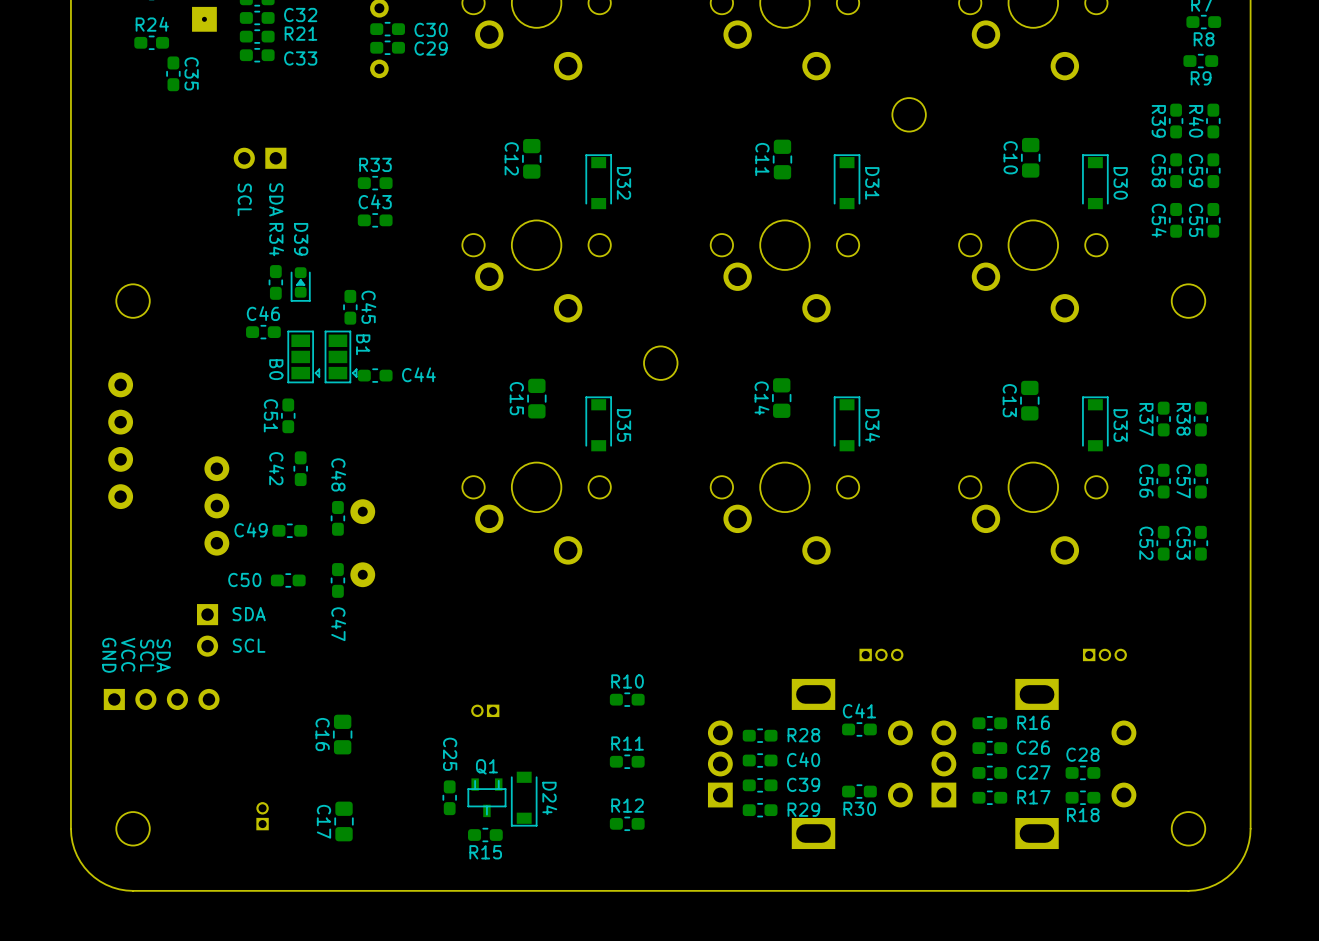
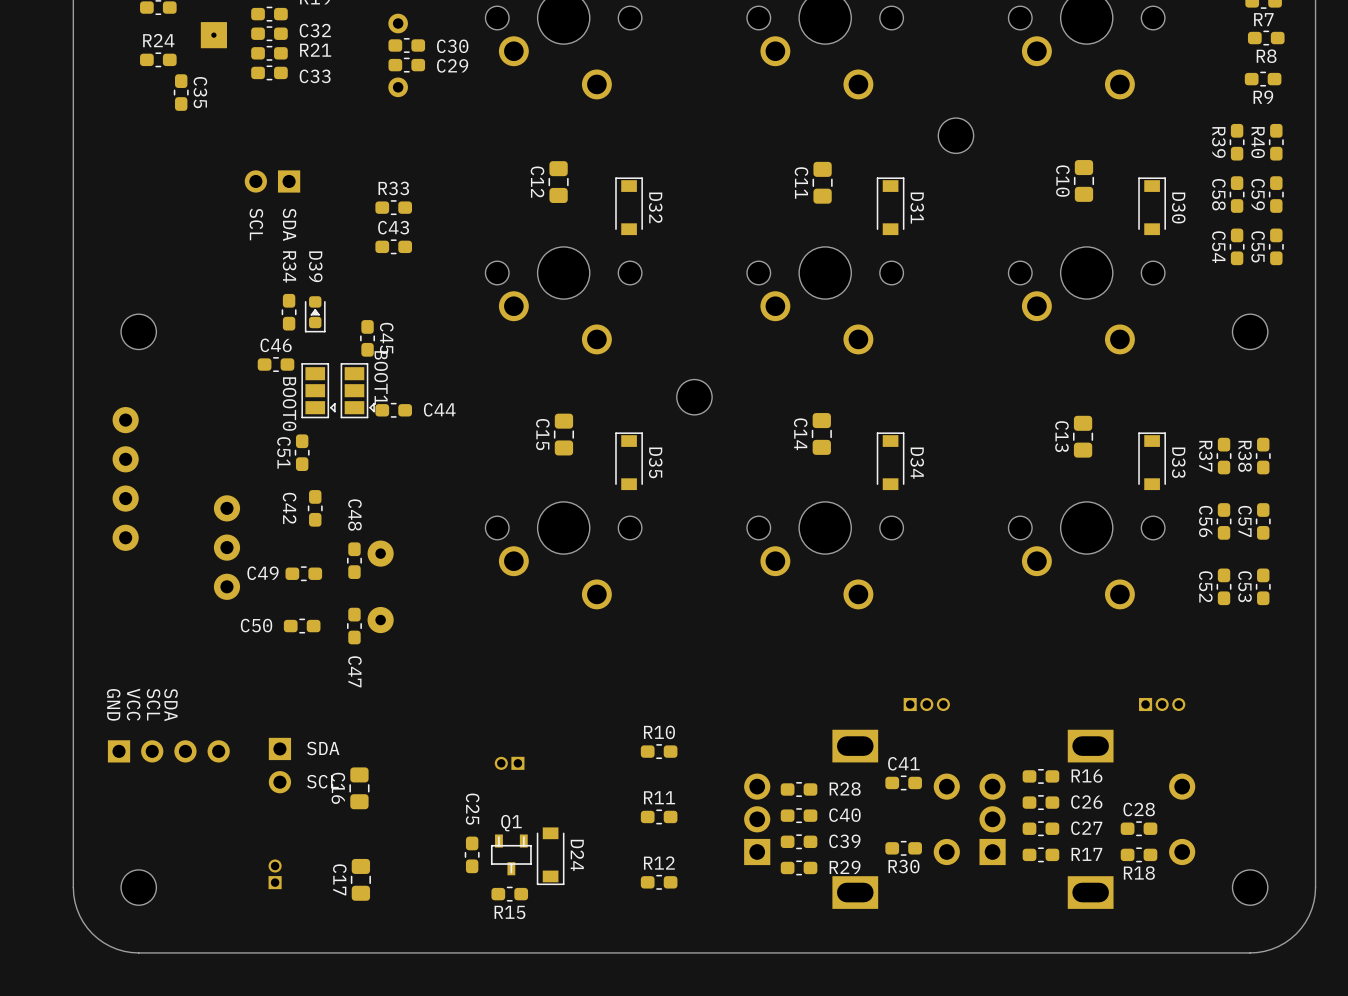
part value: B1 (363, 344) -> BOOT1 (381, 377)
part value: B0 (276, 369) -> BOOT0 (289, 404)
part position: (207, 630) -> (279, 765)

